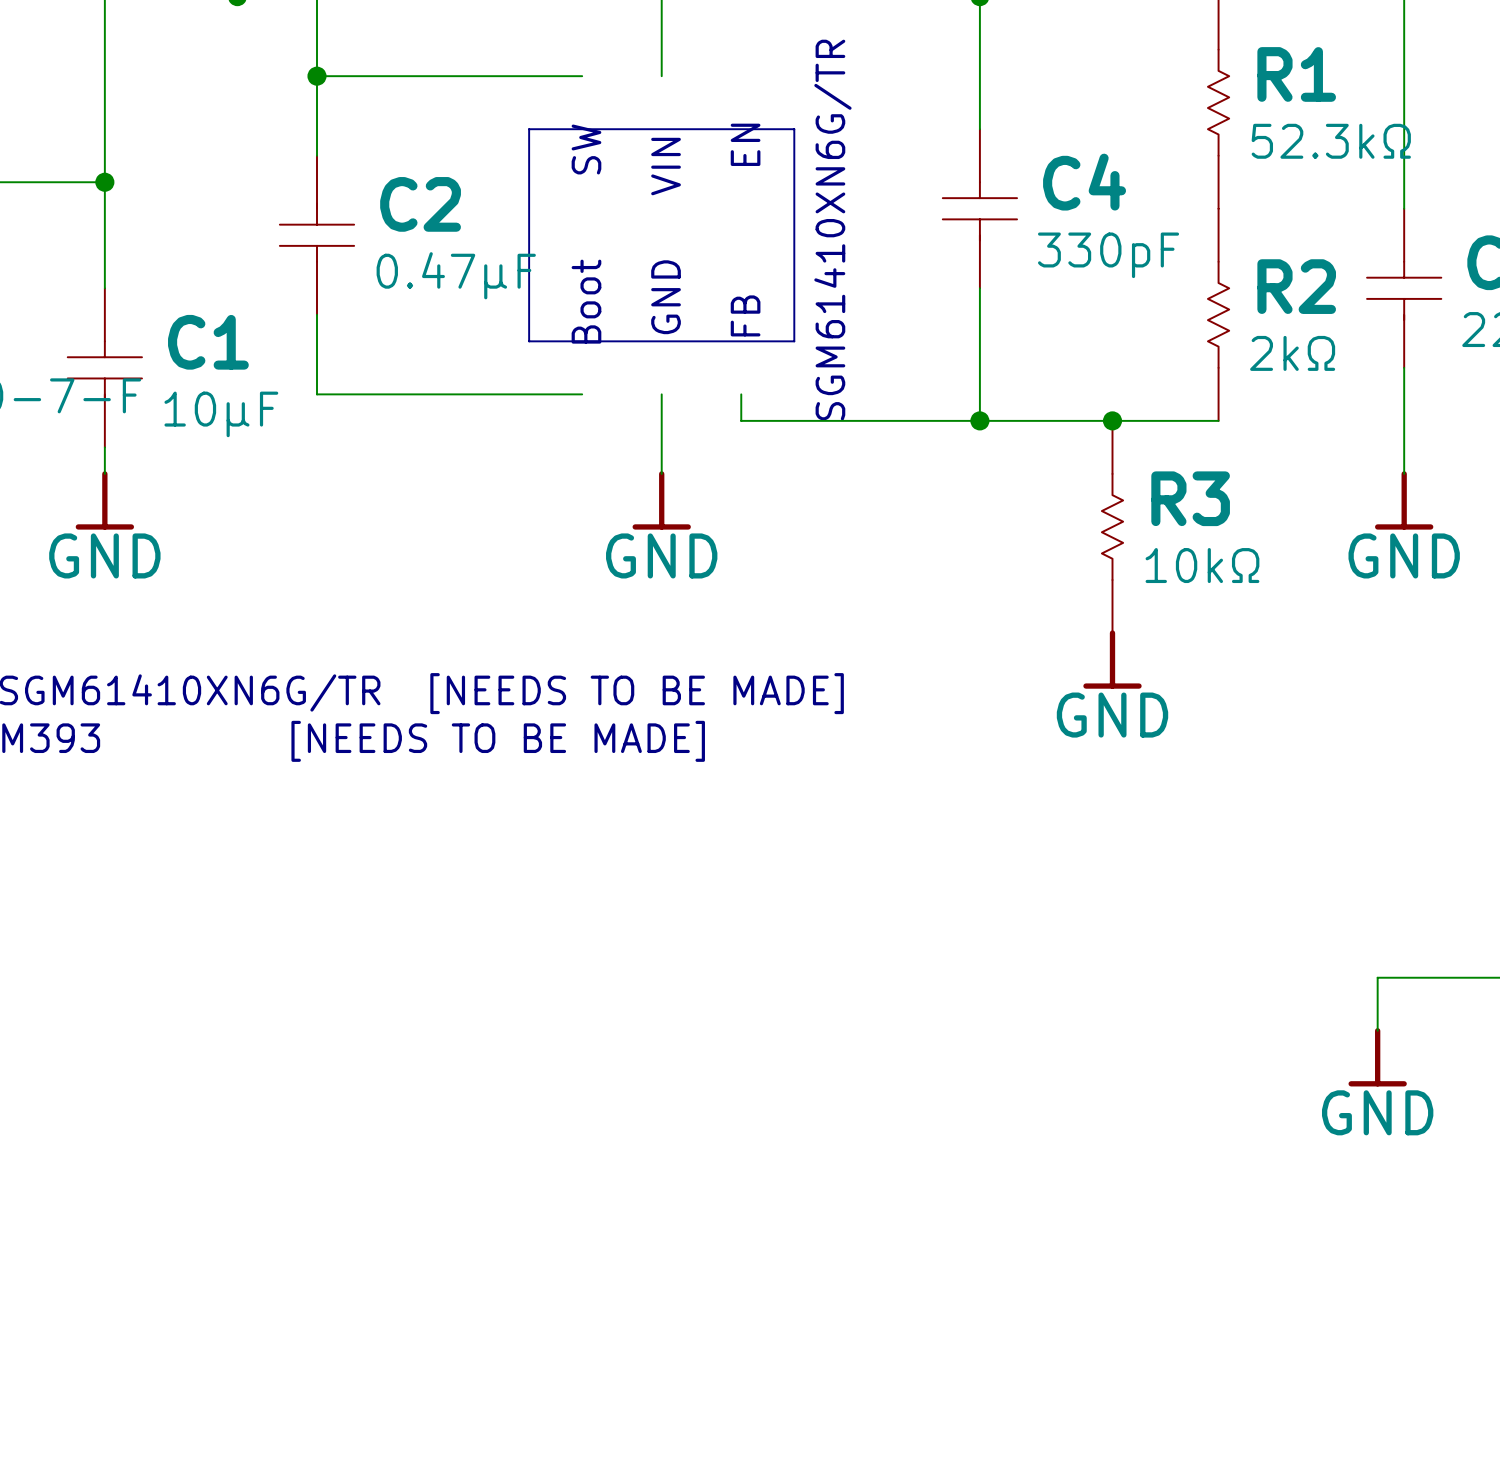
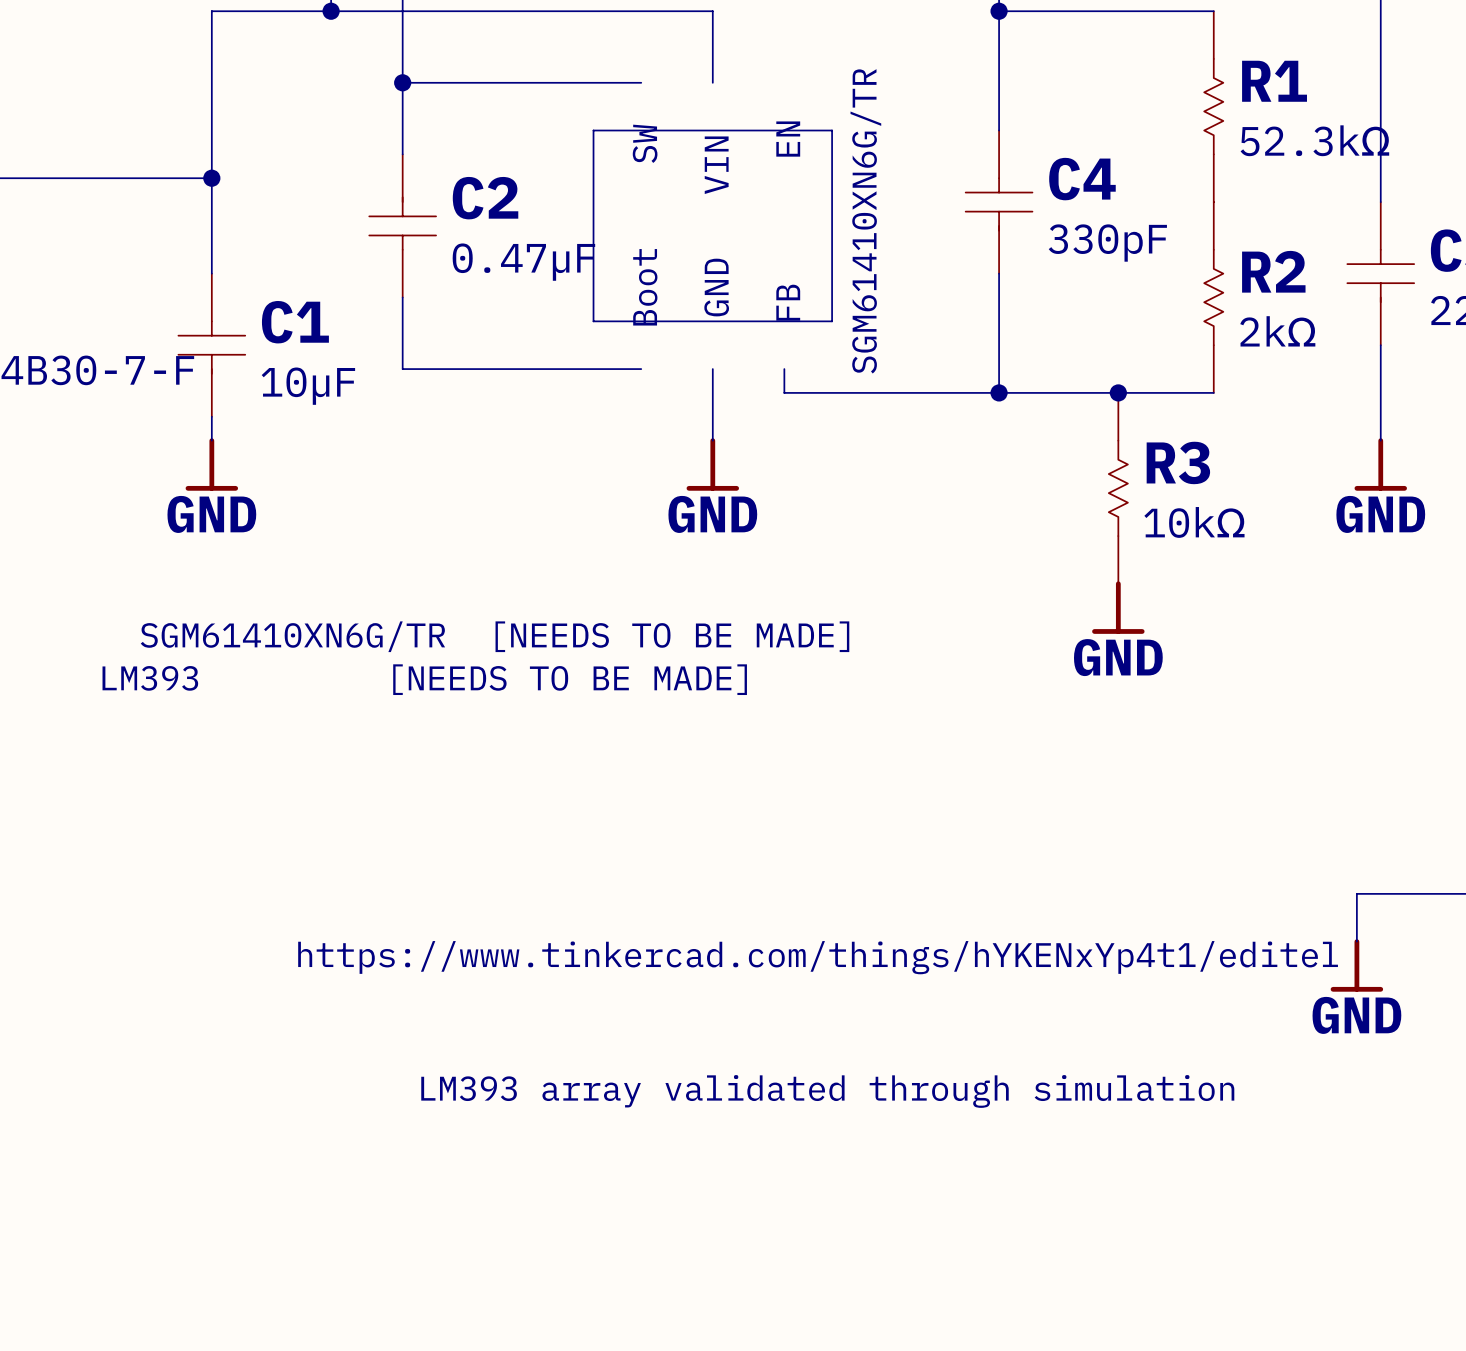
text: none -> https://www.tinkercad.com/things/hYKENxYp4t1/editel (818, 957)
text: none -> LM393 array validated through simulation (827, 1091)

